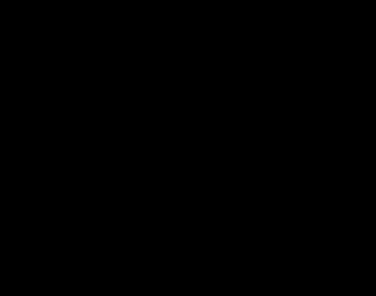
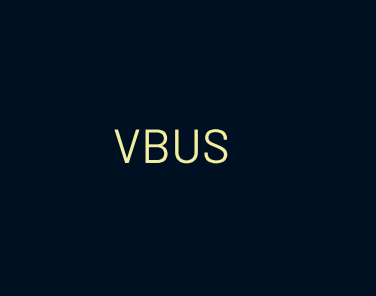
text: none -> VBUS (170, 146)

